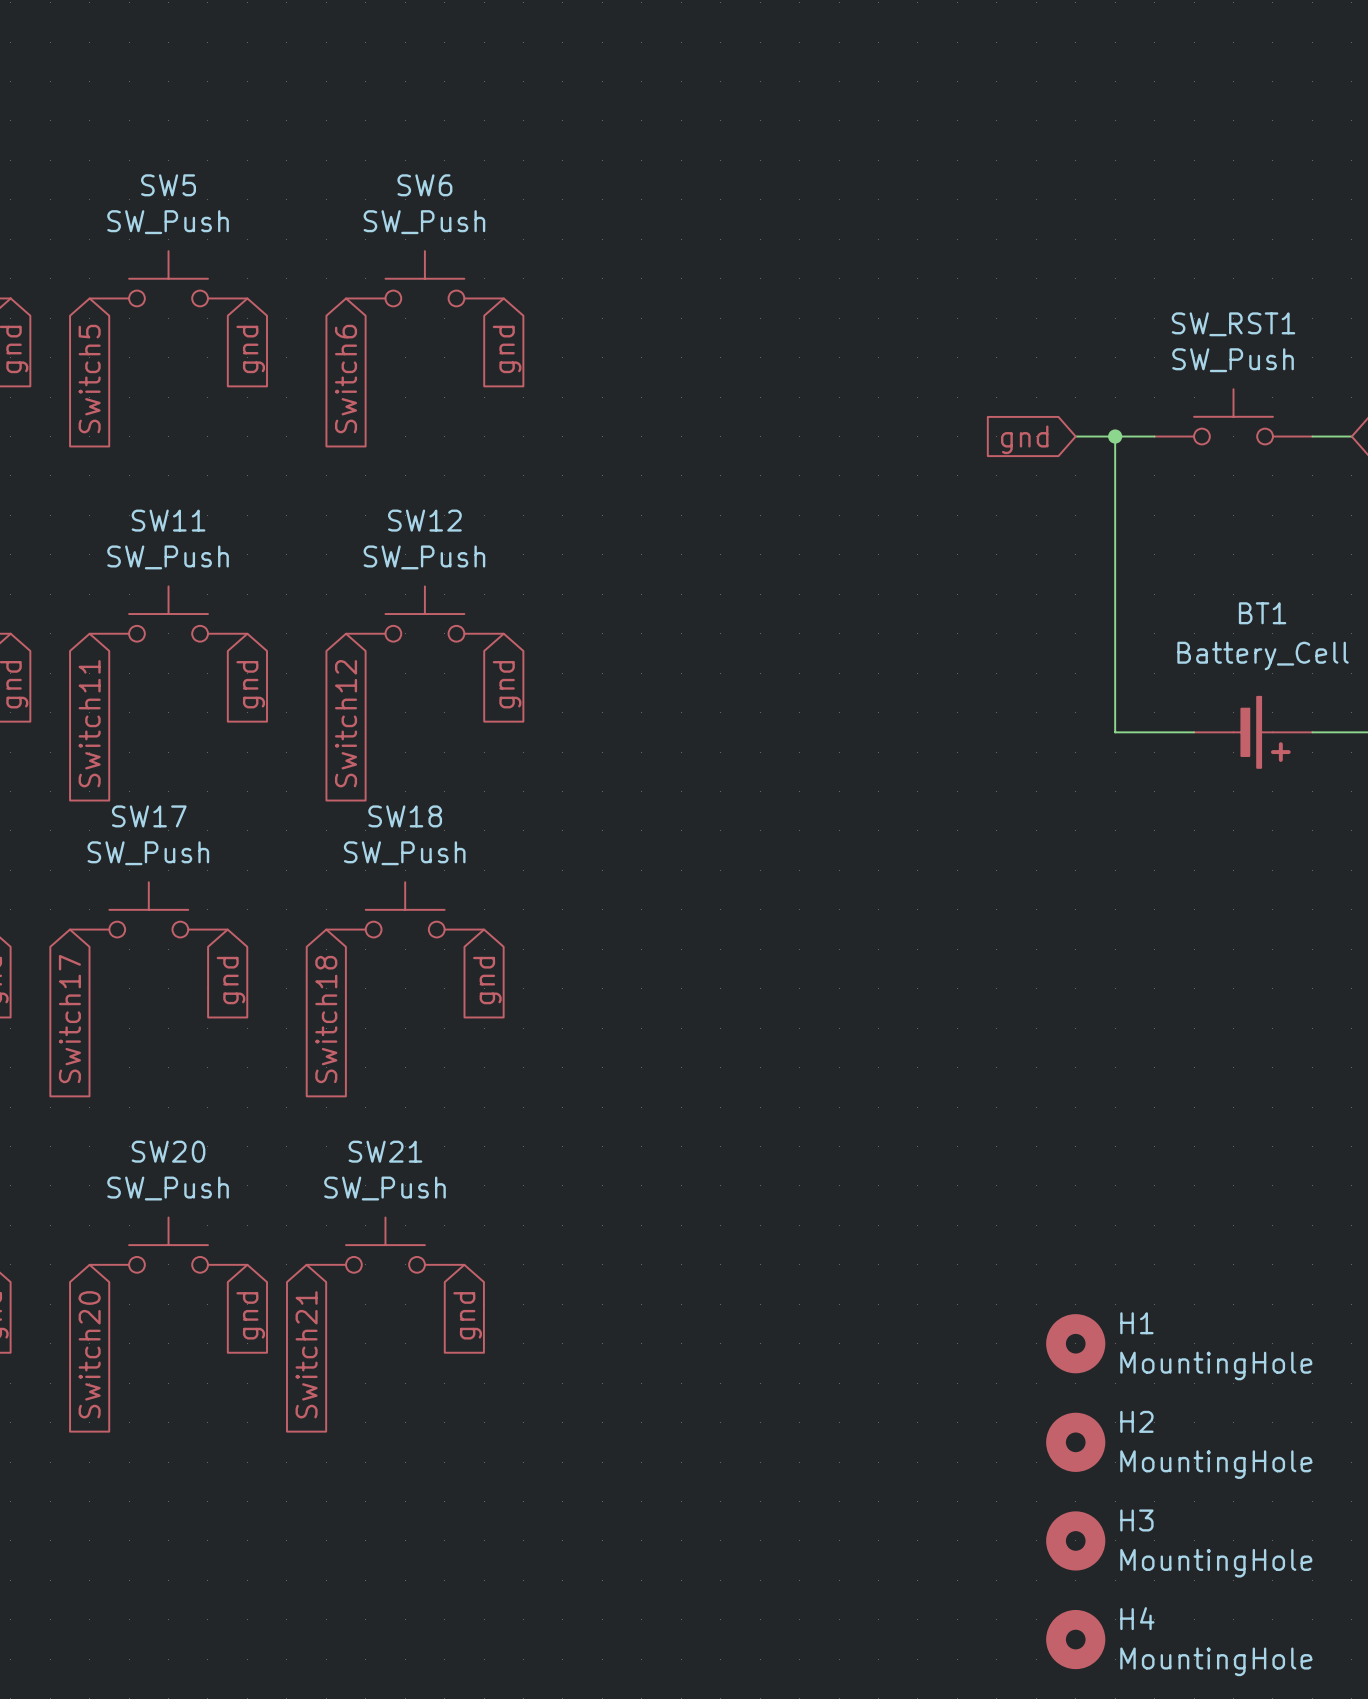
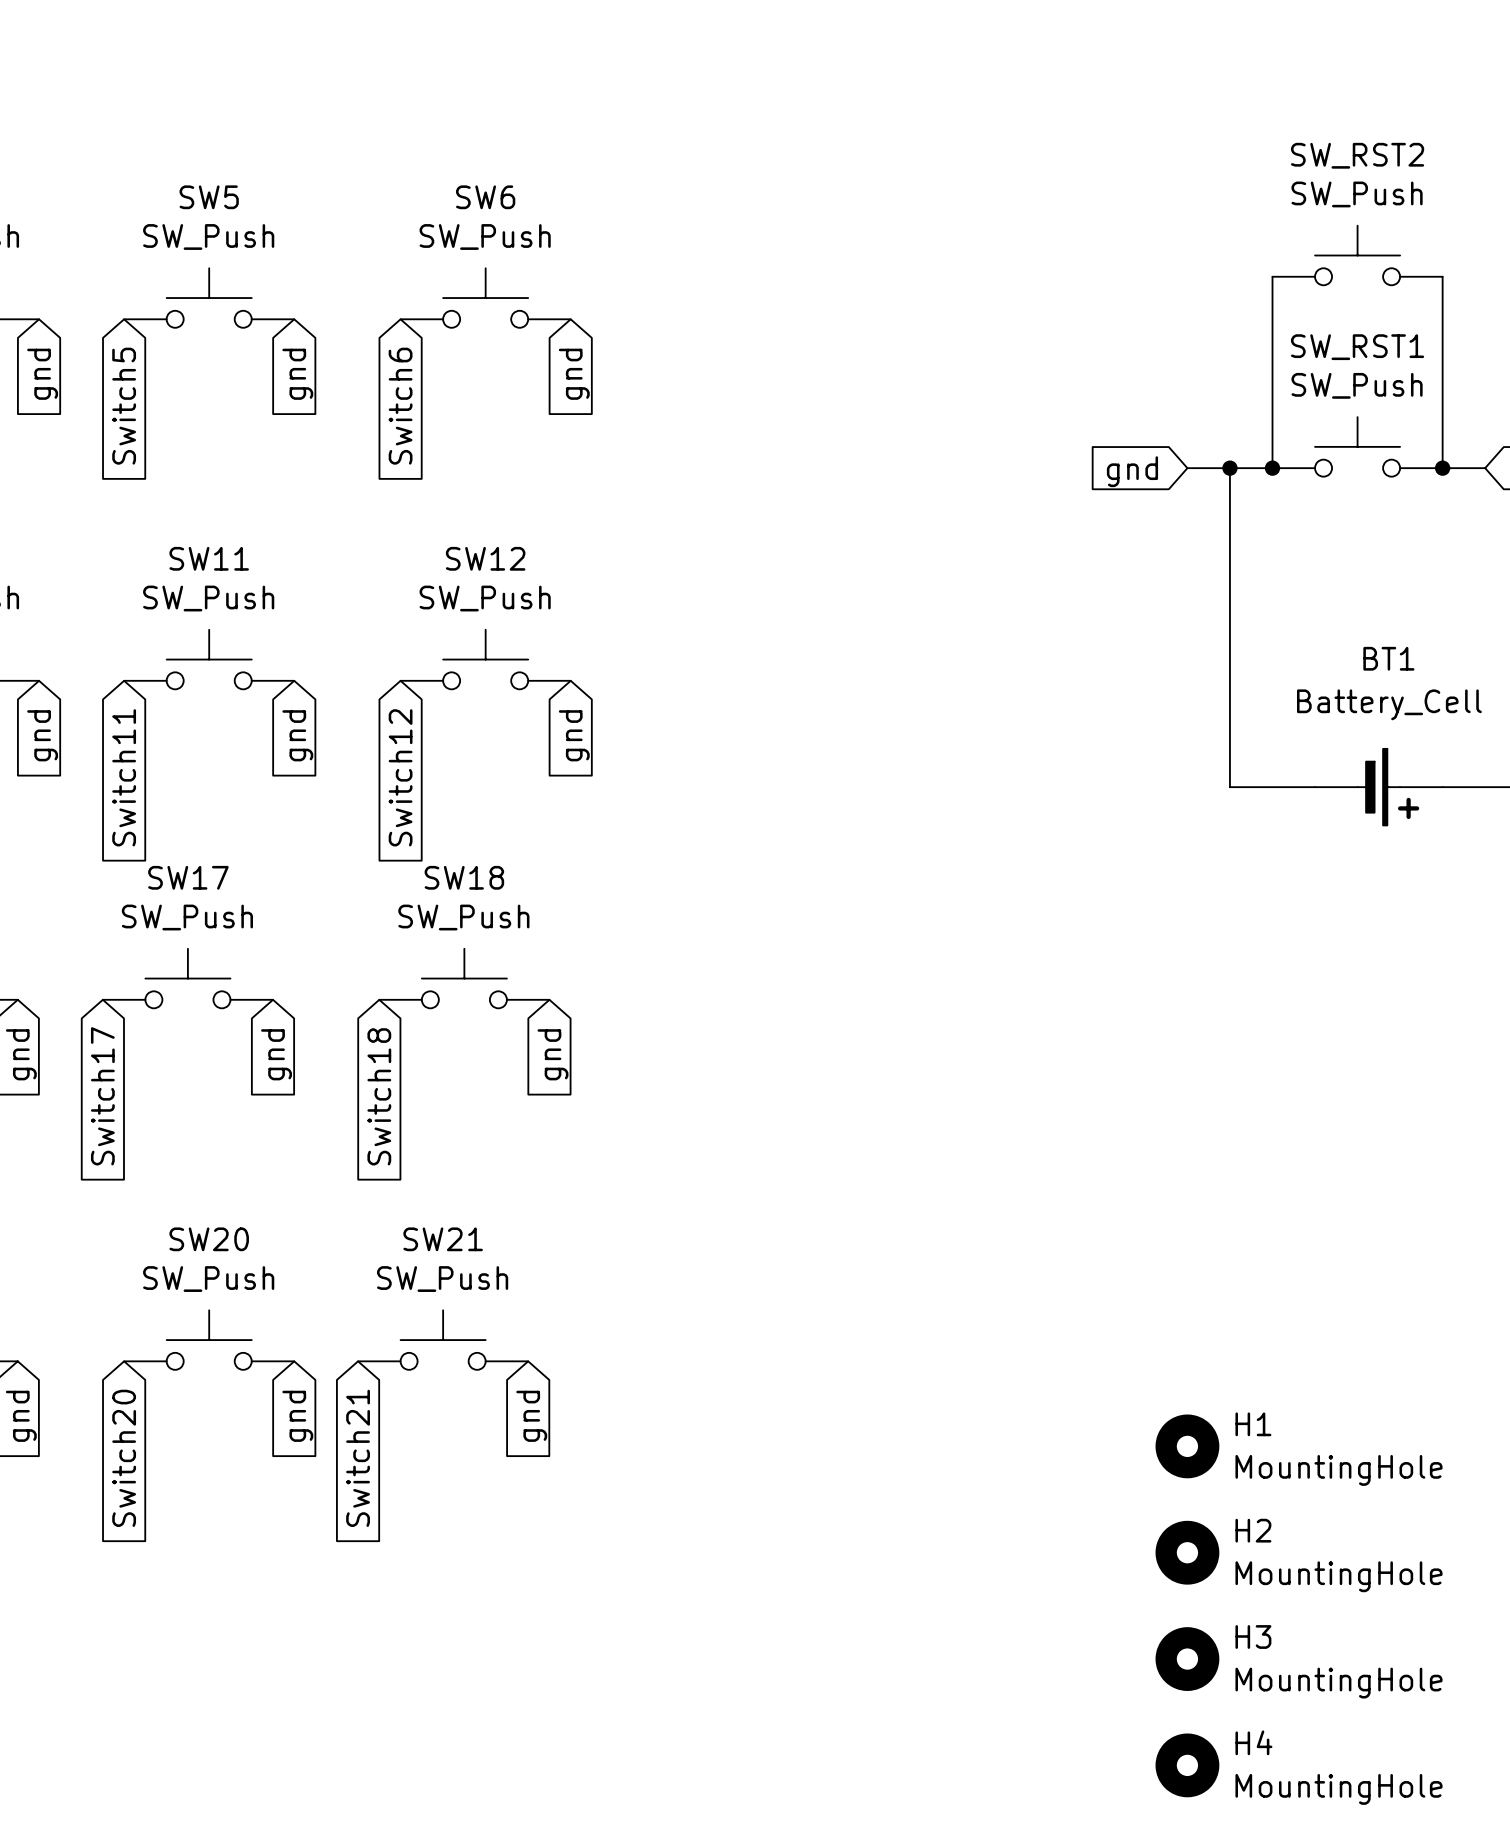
SW_RST2: none -> SW_Push (1357, 255)
wire: none -> (1272, 276) (1272, 468)
wire: none -> (1442, 276) (1442, 468)
junction: none -> (1272, 468)
junction: none -> (1442, 468)

